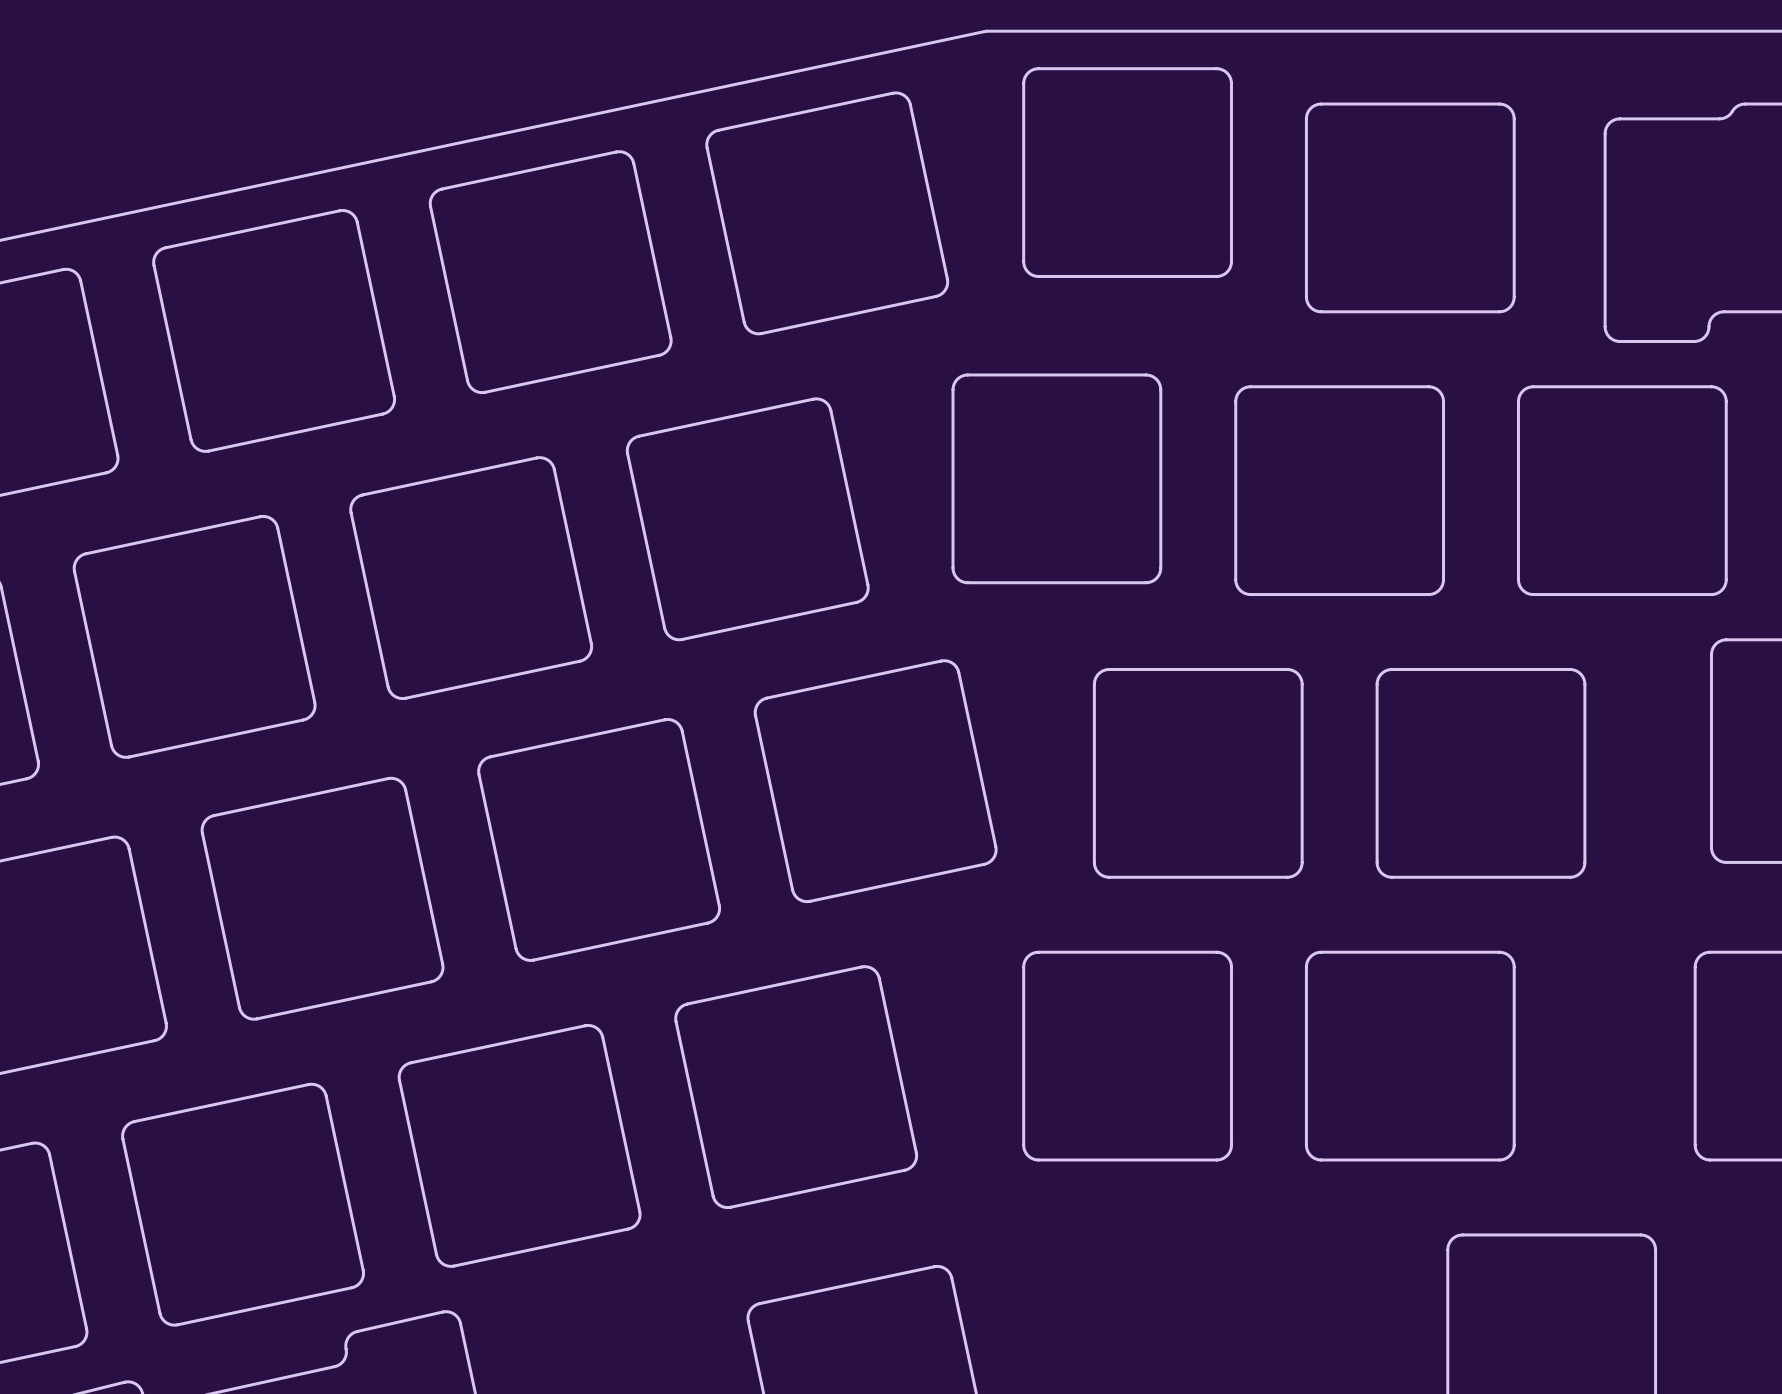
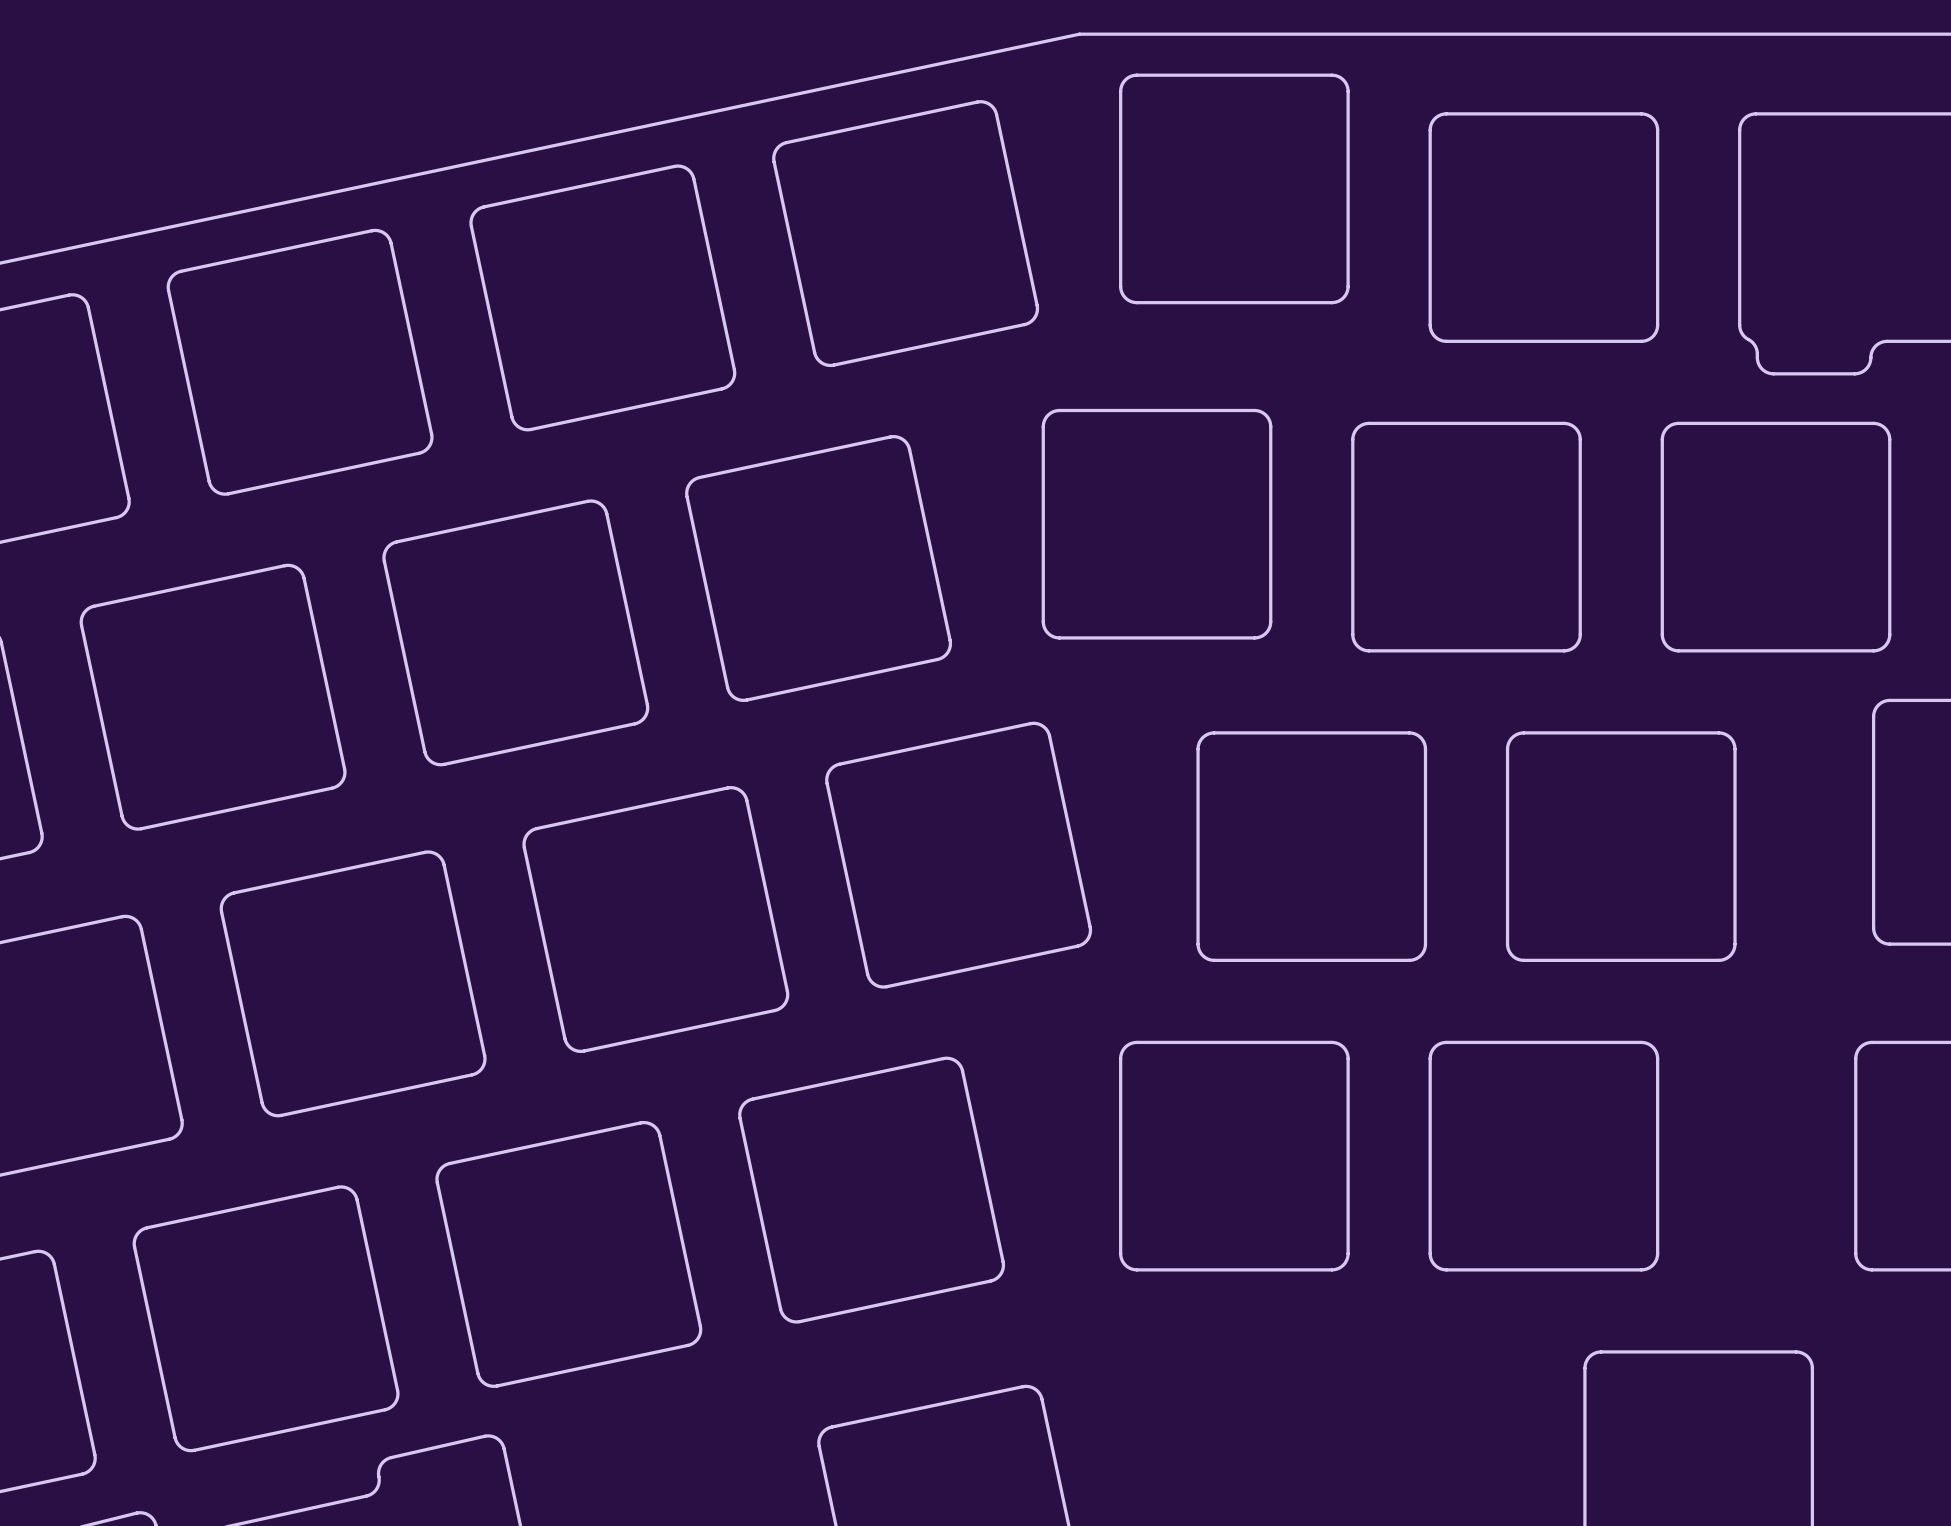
board edge: none -> (1755, 113) (1910, 113)
board edge: (1745, 104) (1737, 106) (1728, 115) (1721, 118) (1618, 118) (1607, 126) (1605, 133) (1605, 326) (1609, 337) (1619, 341) -> (1755, 113) (1744, 118) (1739, 128) (1739, 326) (1743, 335) (1755, 347) (1760, 367) (1765, 371) (1773, 373)

